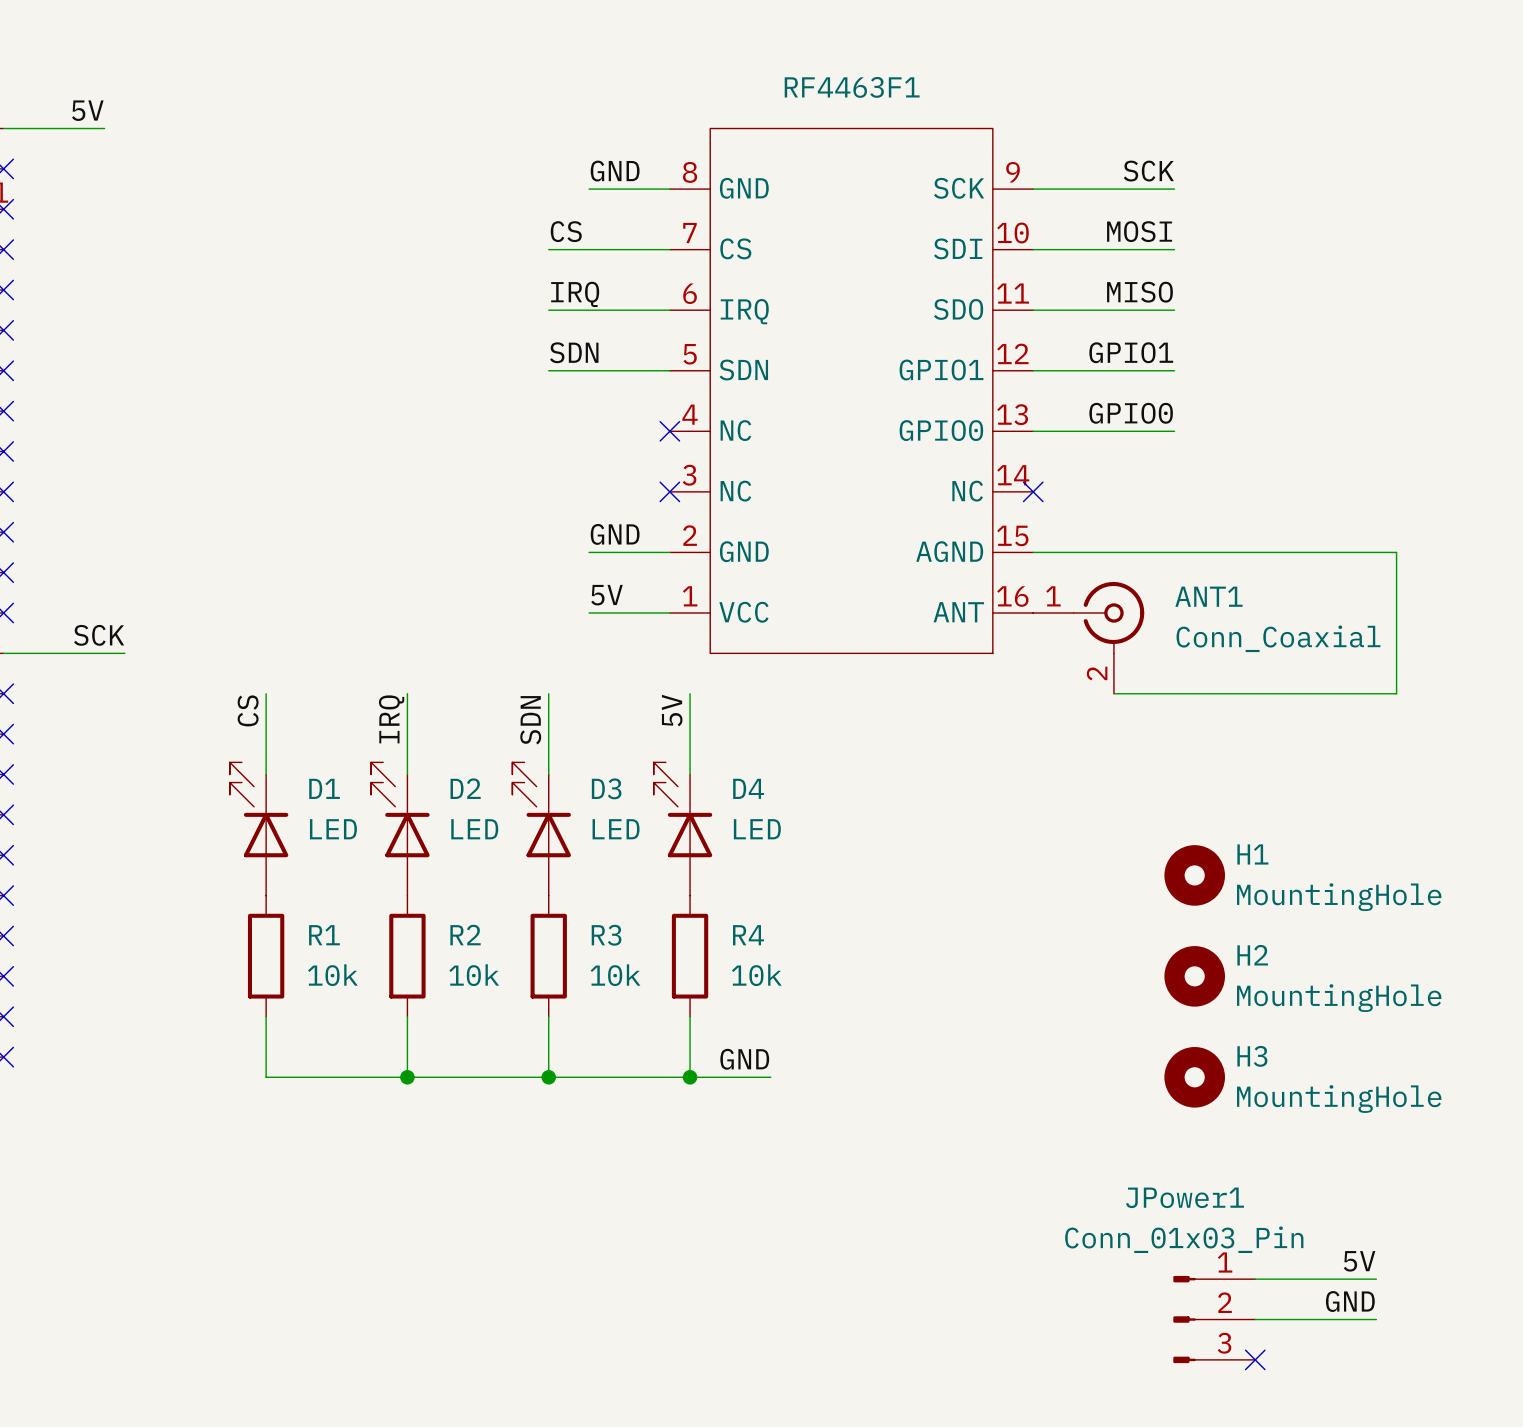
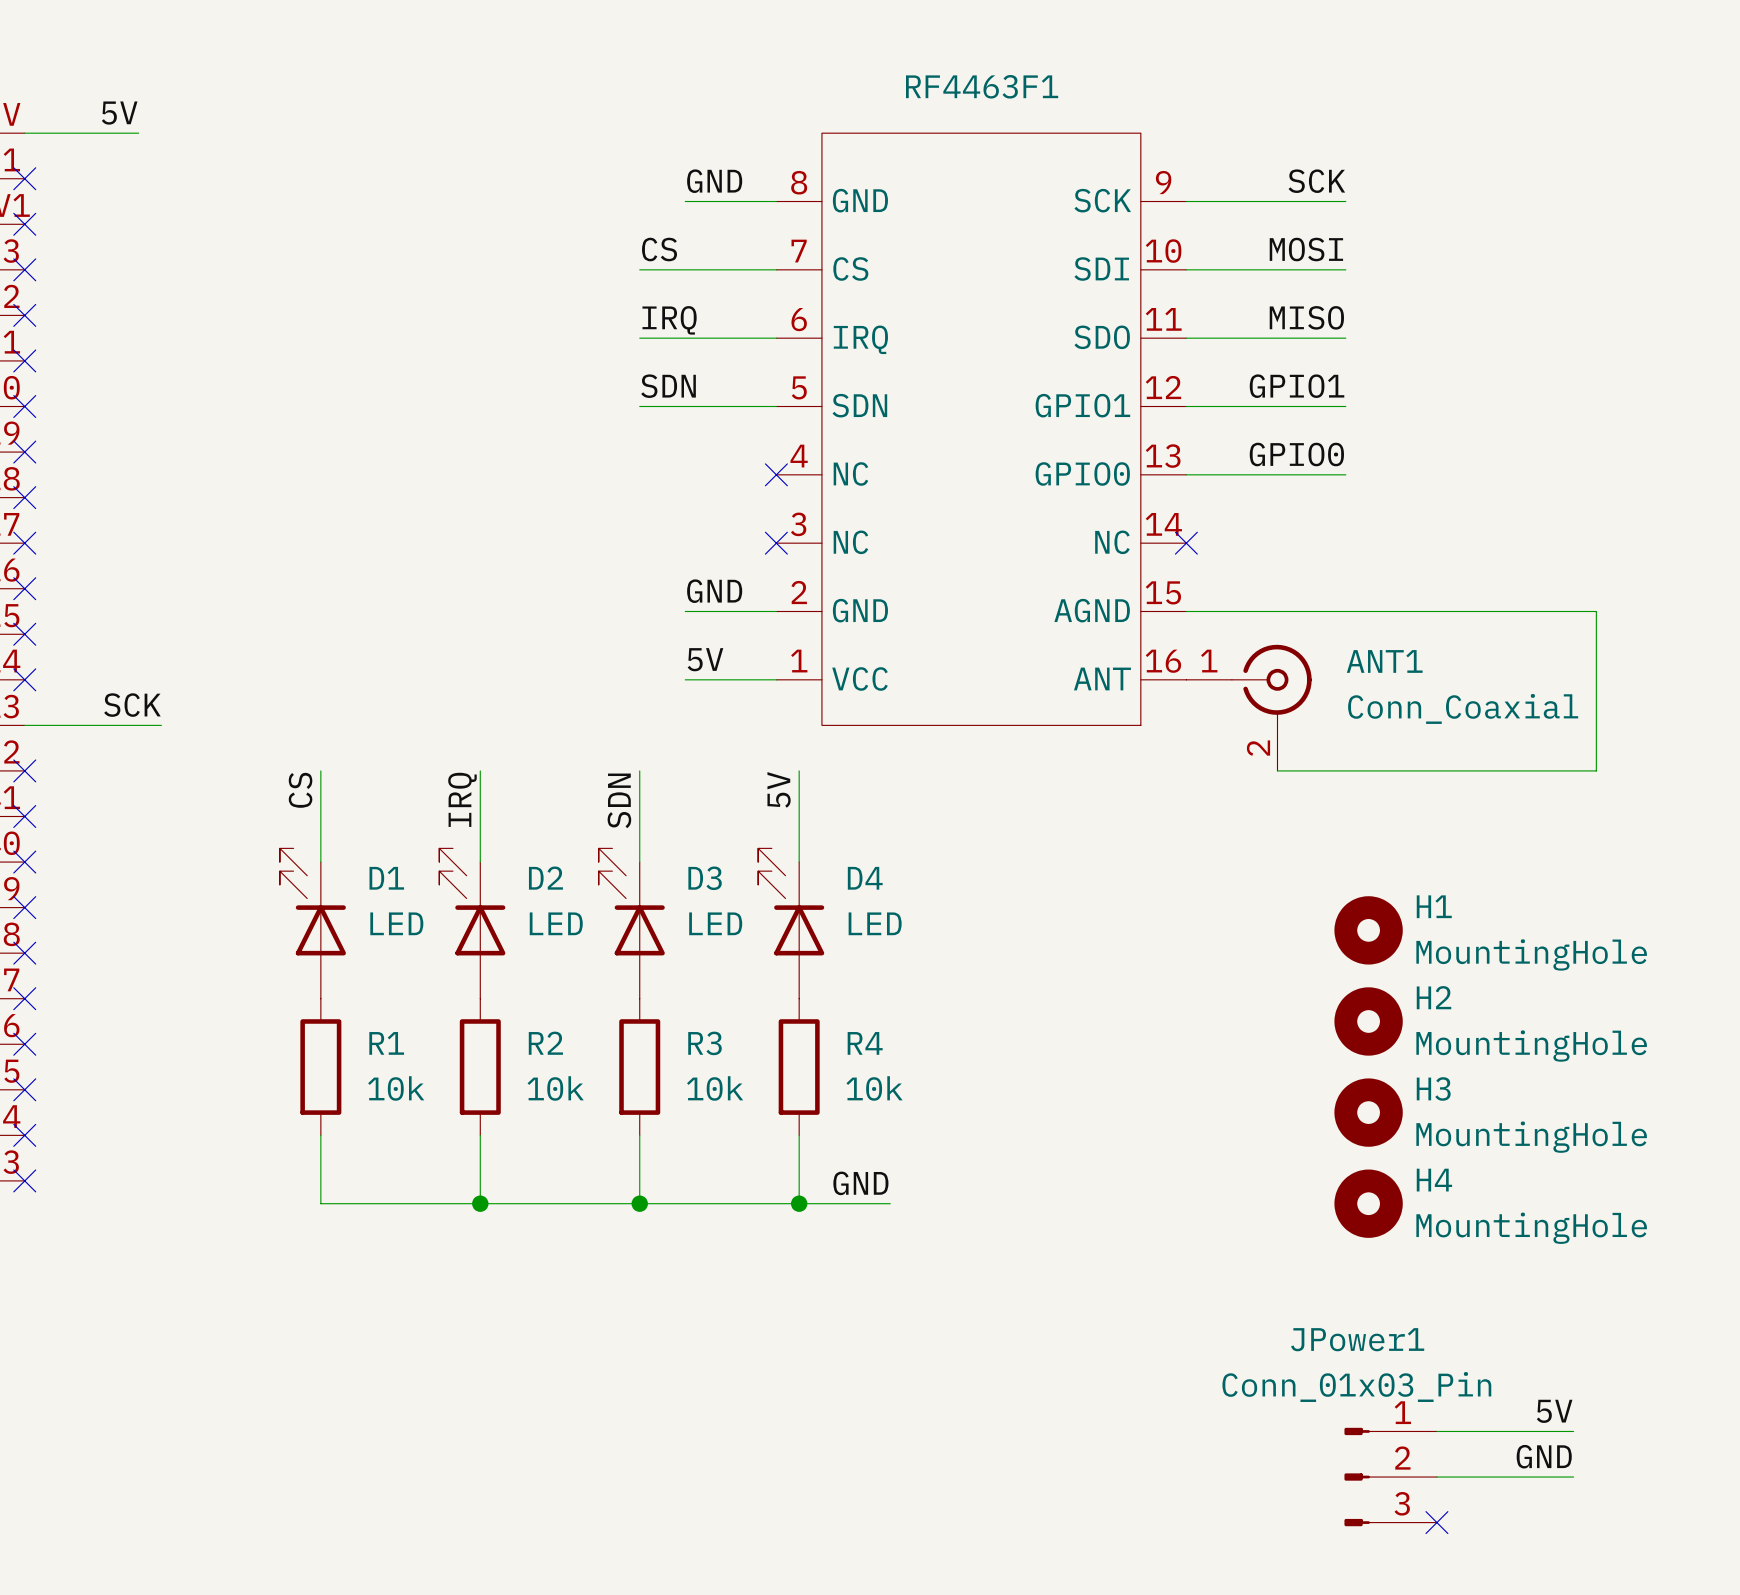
H1 position: (1194, 875) -> (1368, 930)
H2 position: (1194, 976) -> (1368, 1021)
H3: none -> MountingHole (1368, 1112)
H3 name: H3 (1252, 1056) -> H4 (1434, 1180)

